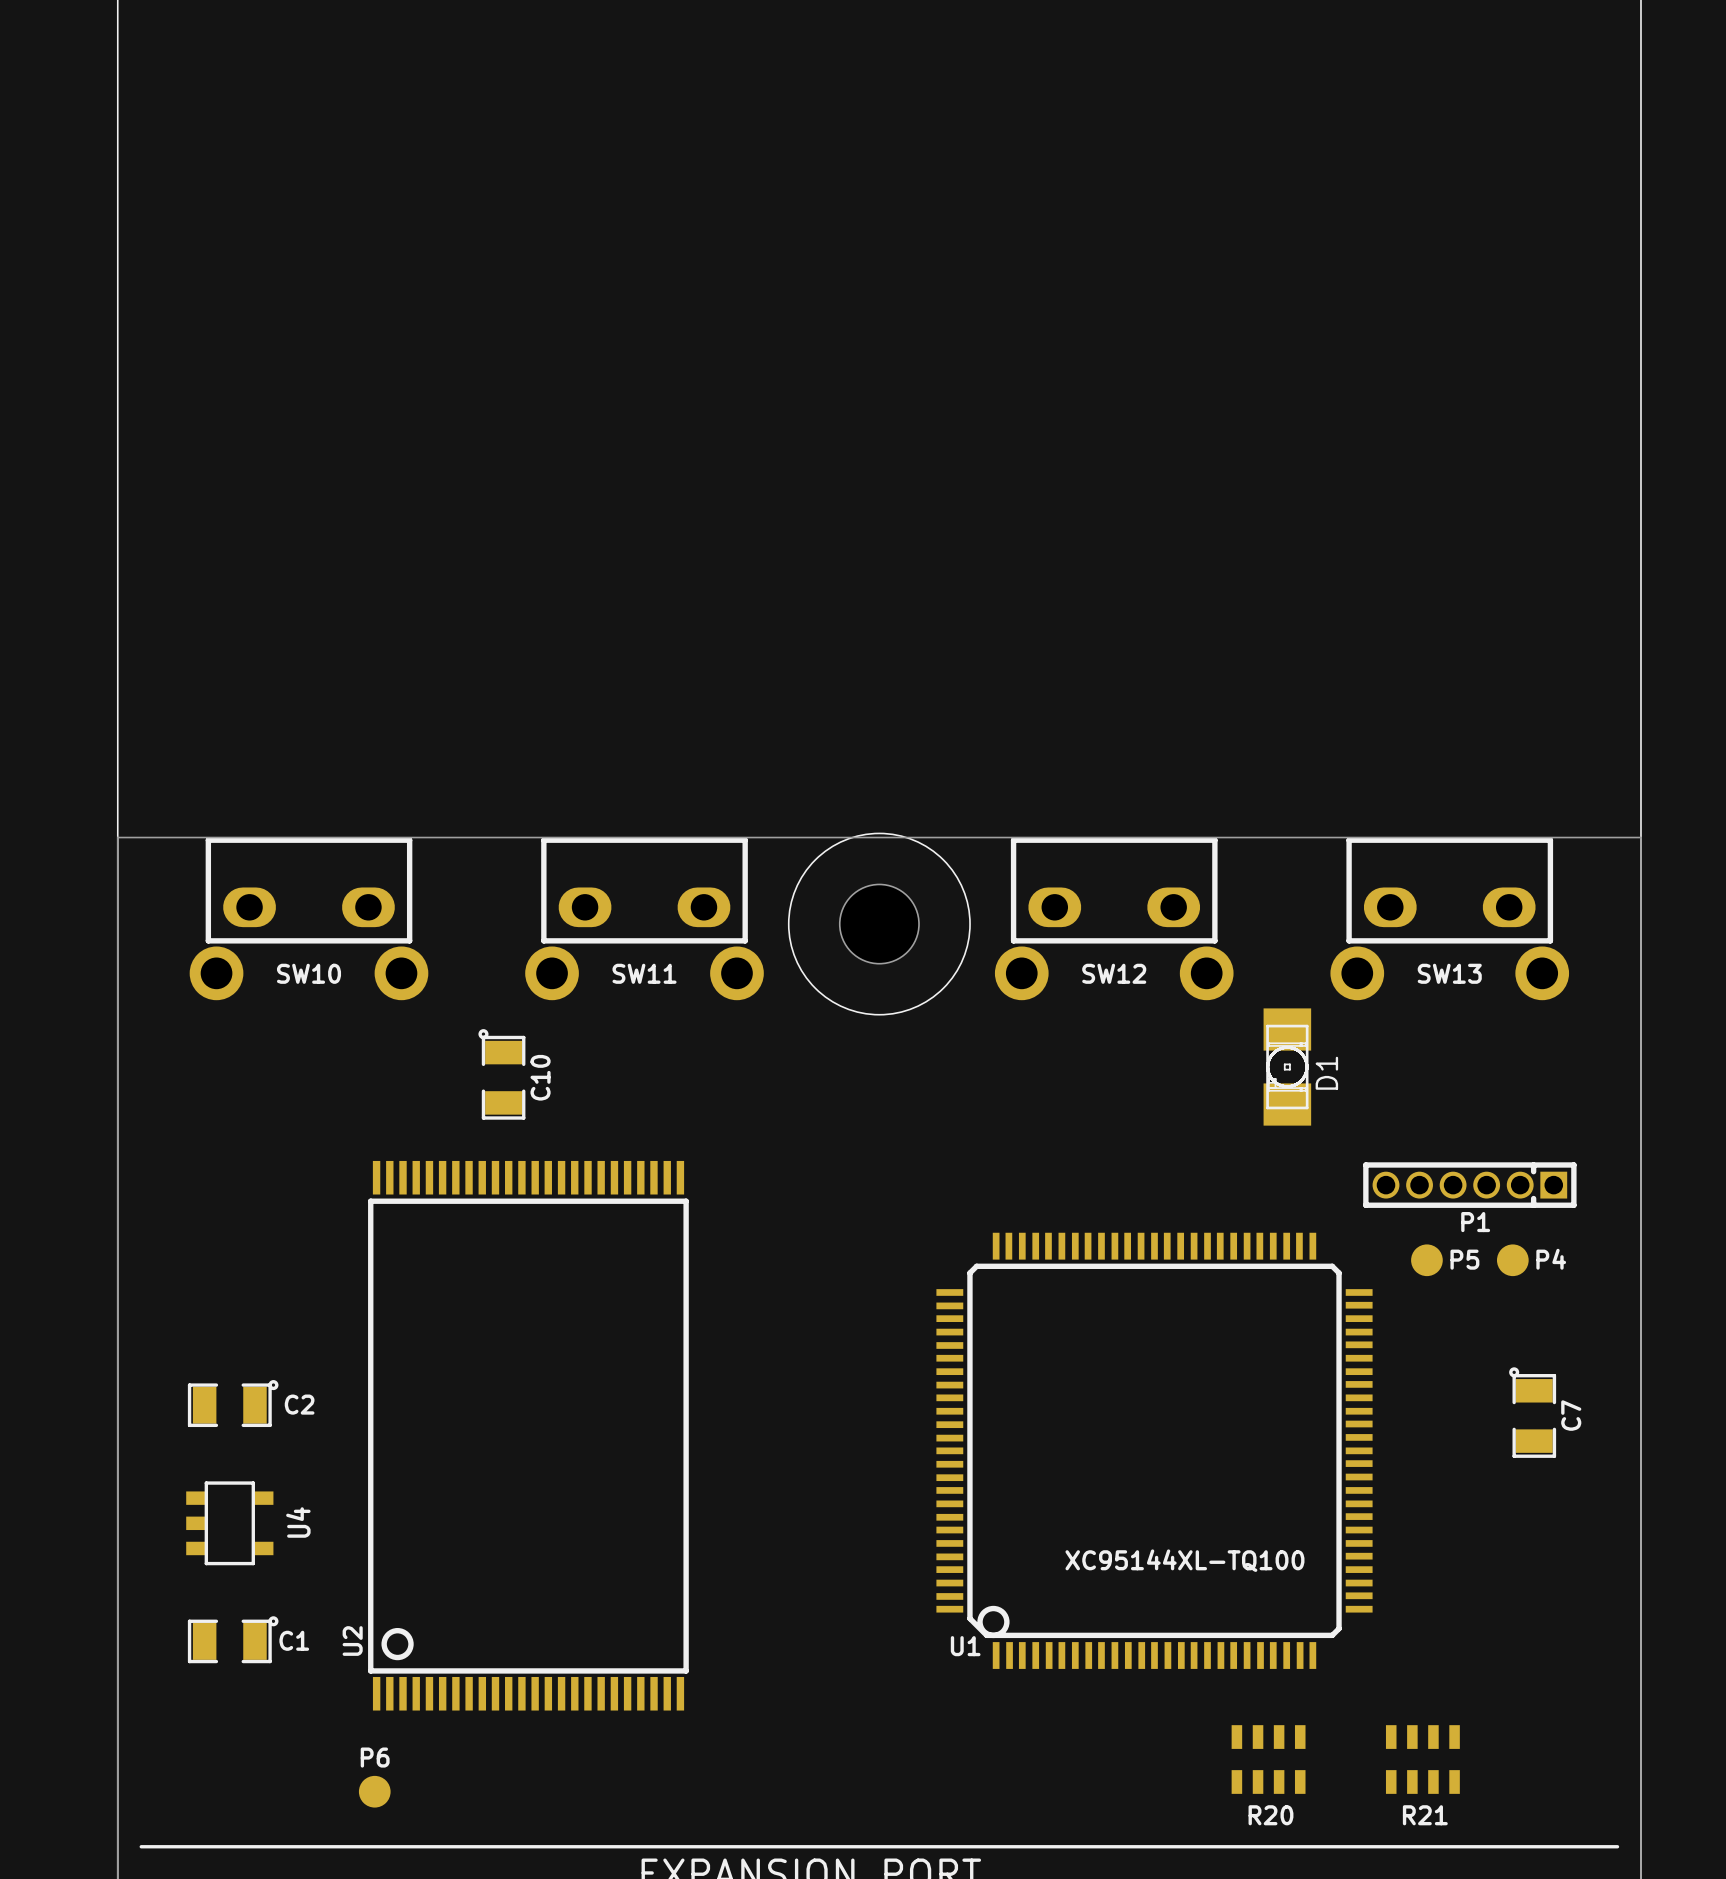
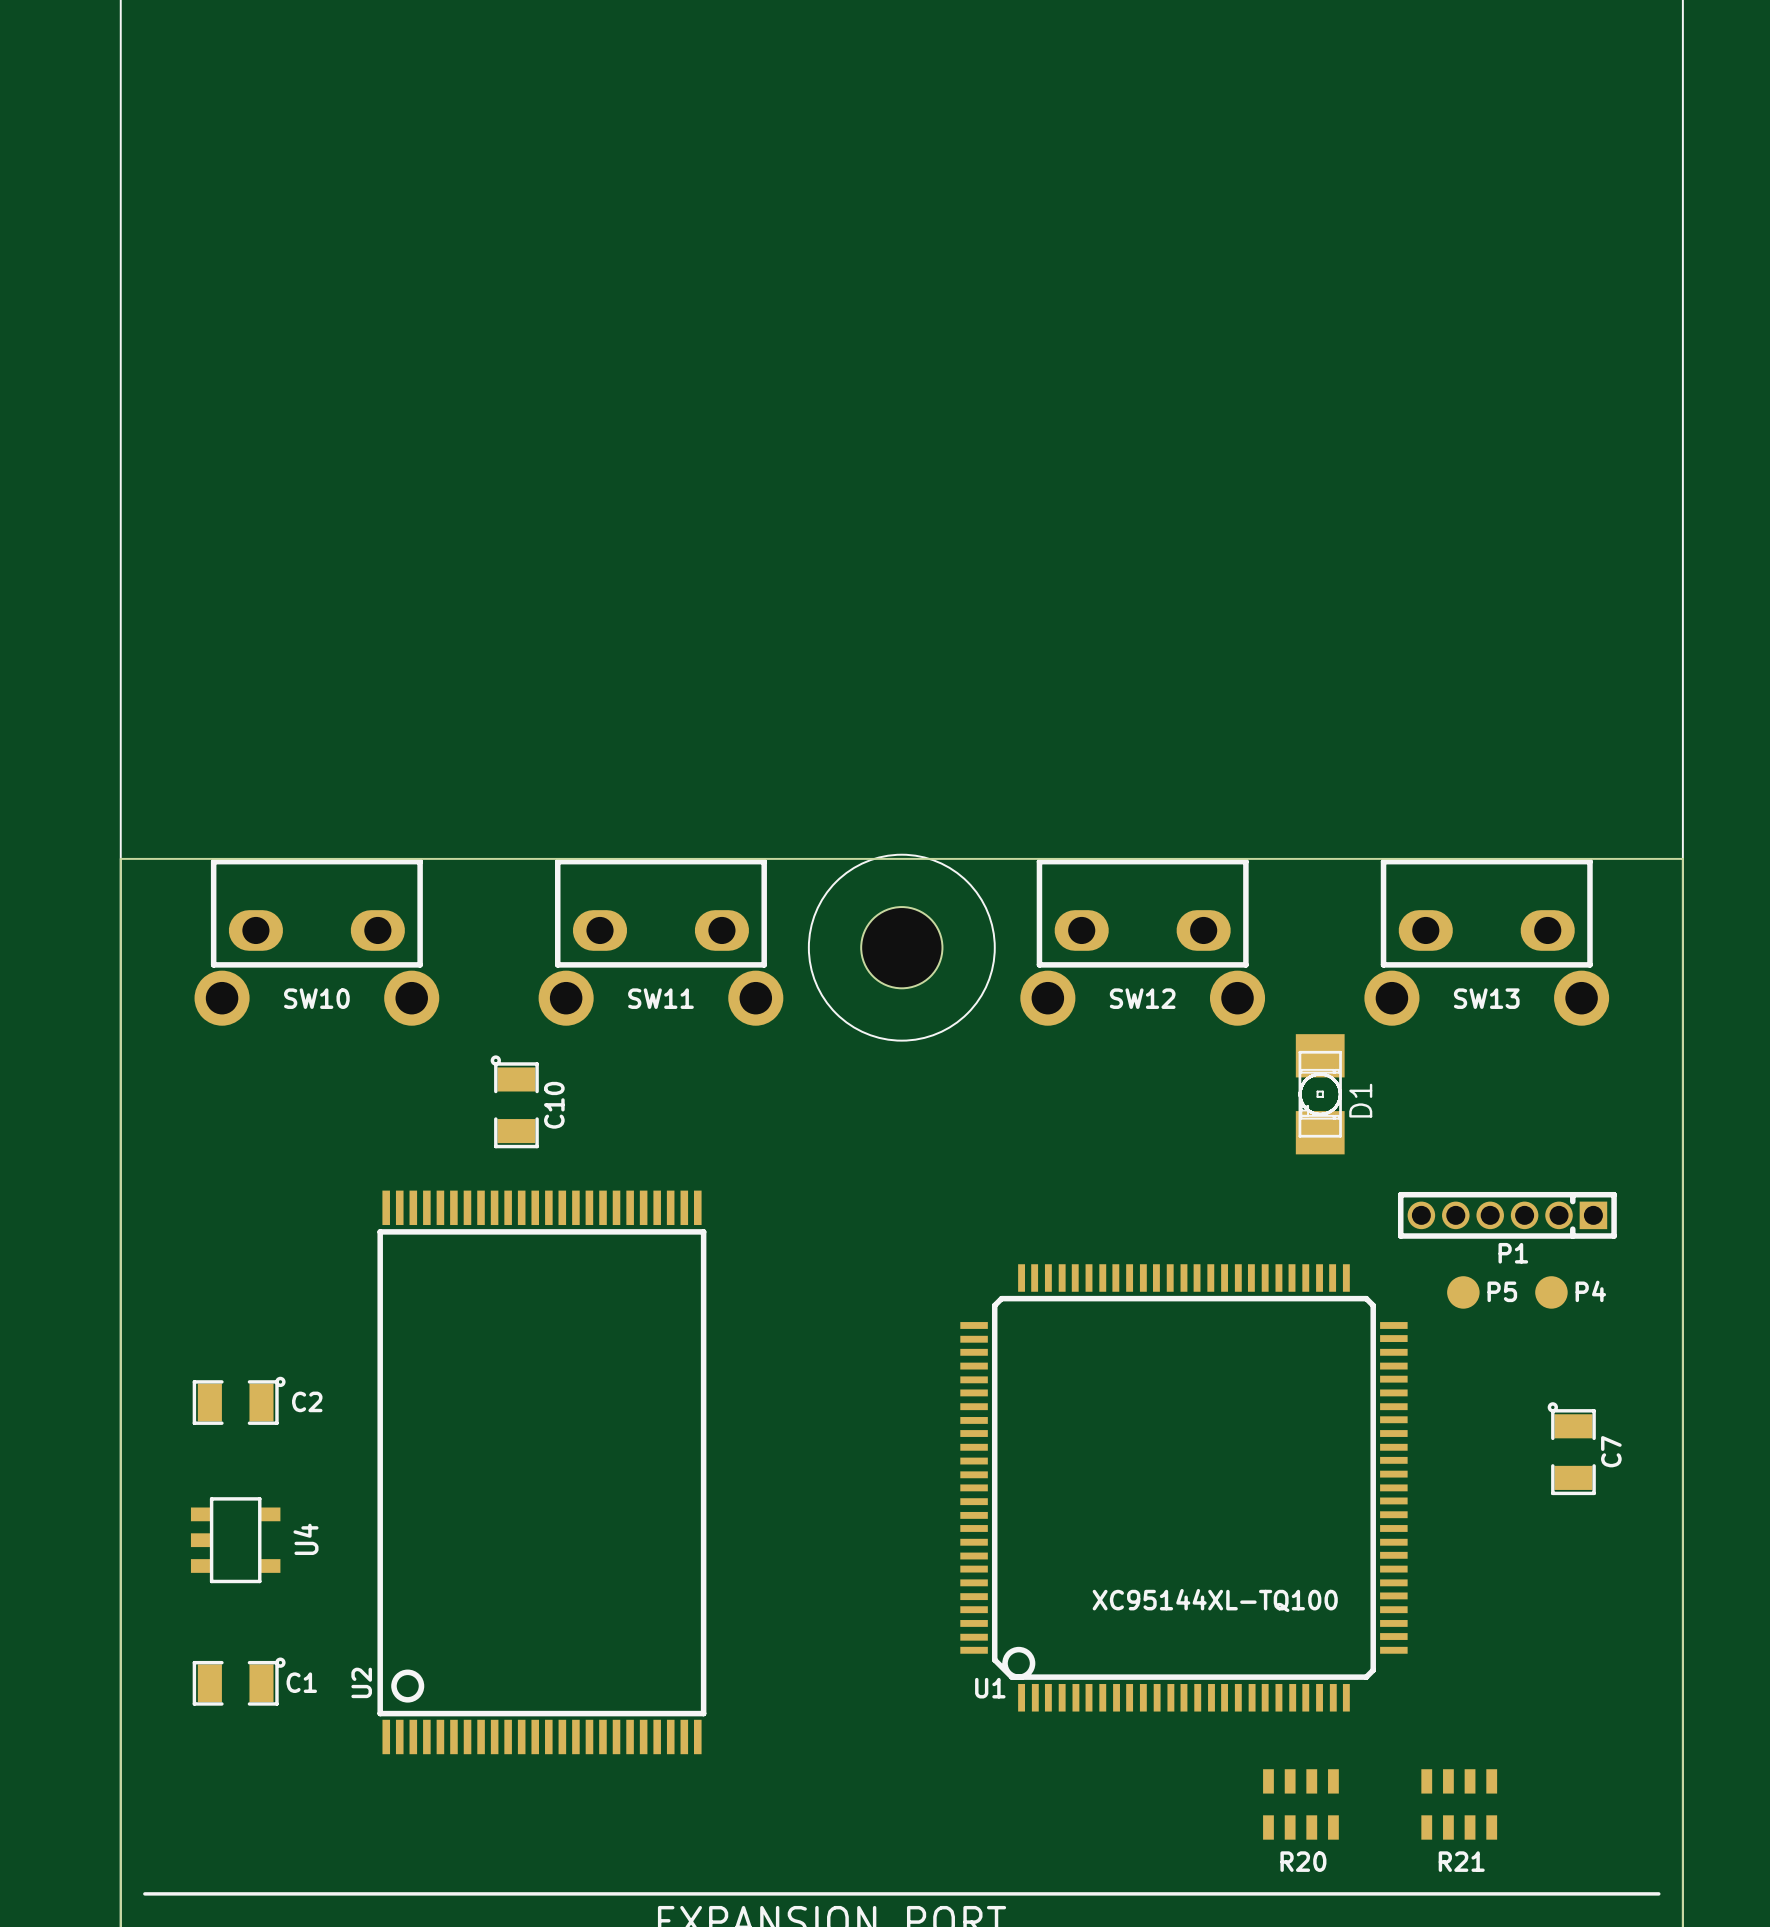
C2 position: (233, 1403) -> (239, 1400)
U4 position: (229, 1523) -> (235, 1540)
P6: (374, 1791) -> none

